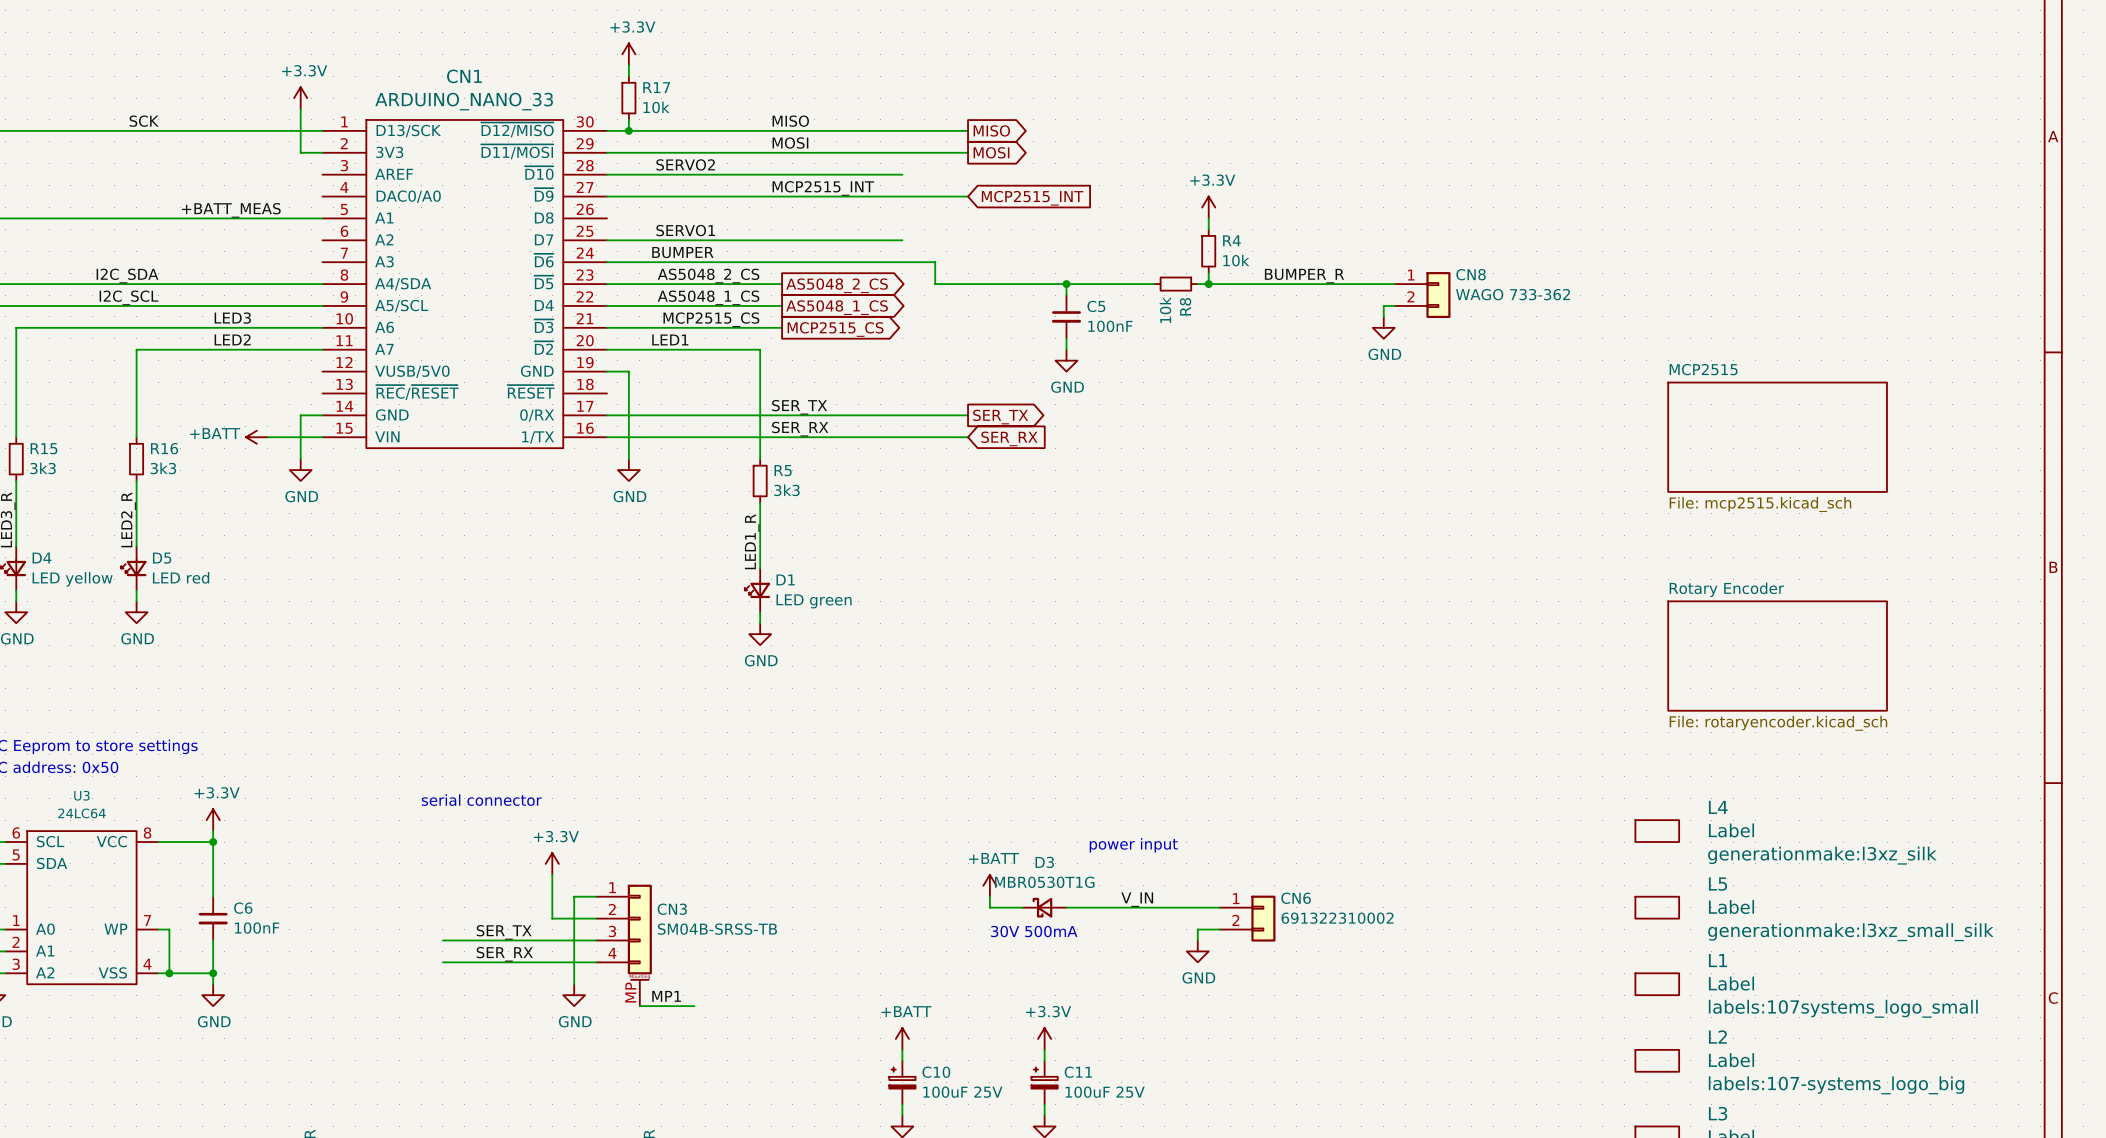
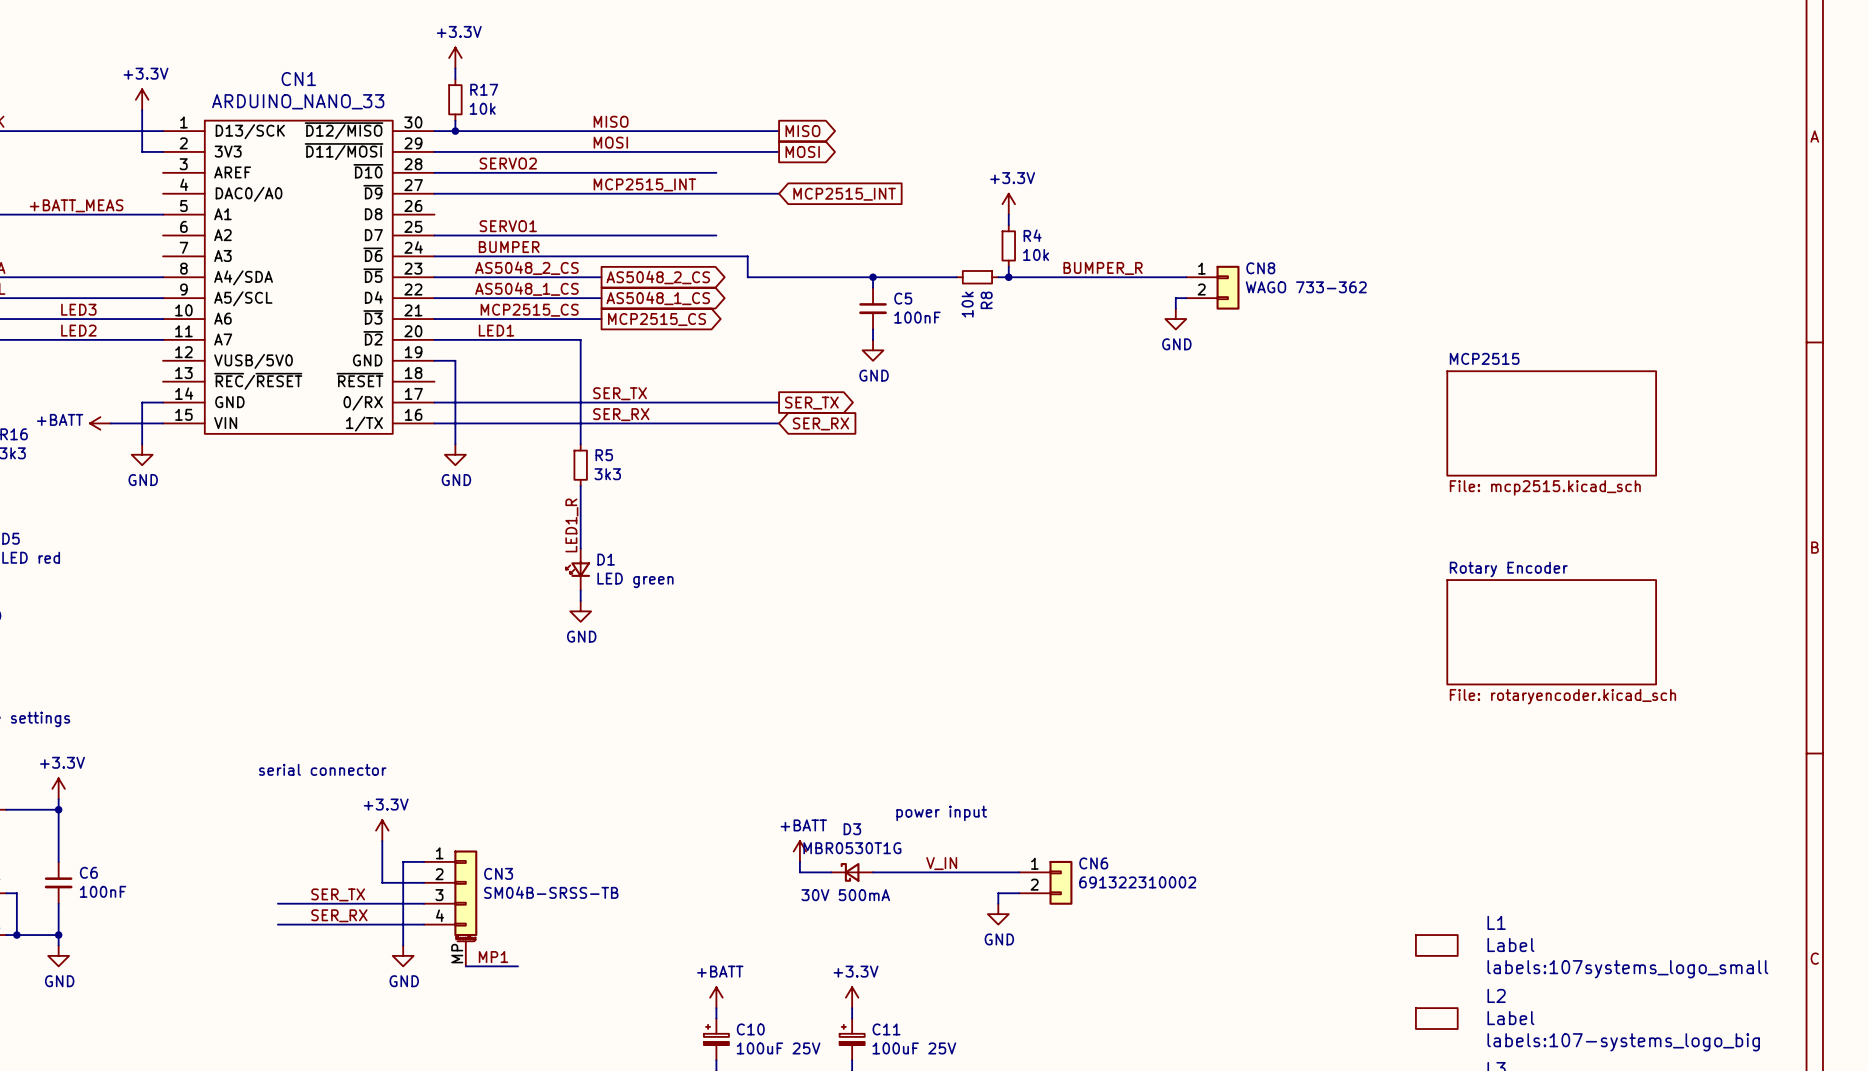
L4: Label (1657, 831) -> none
L5: Label (1657, 907) -> none

